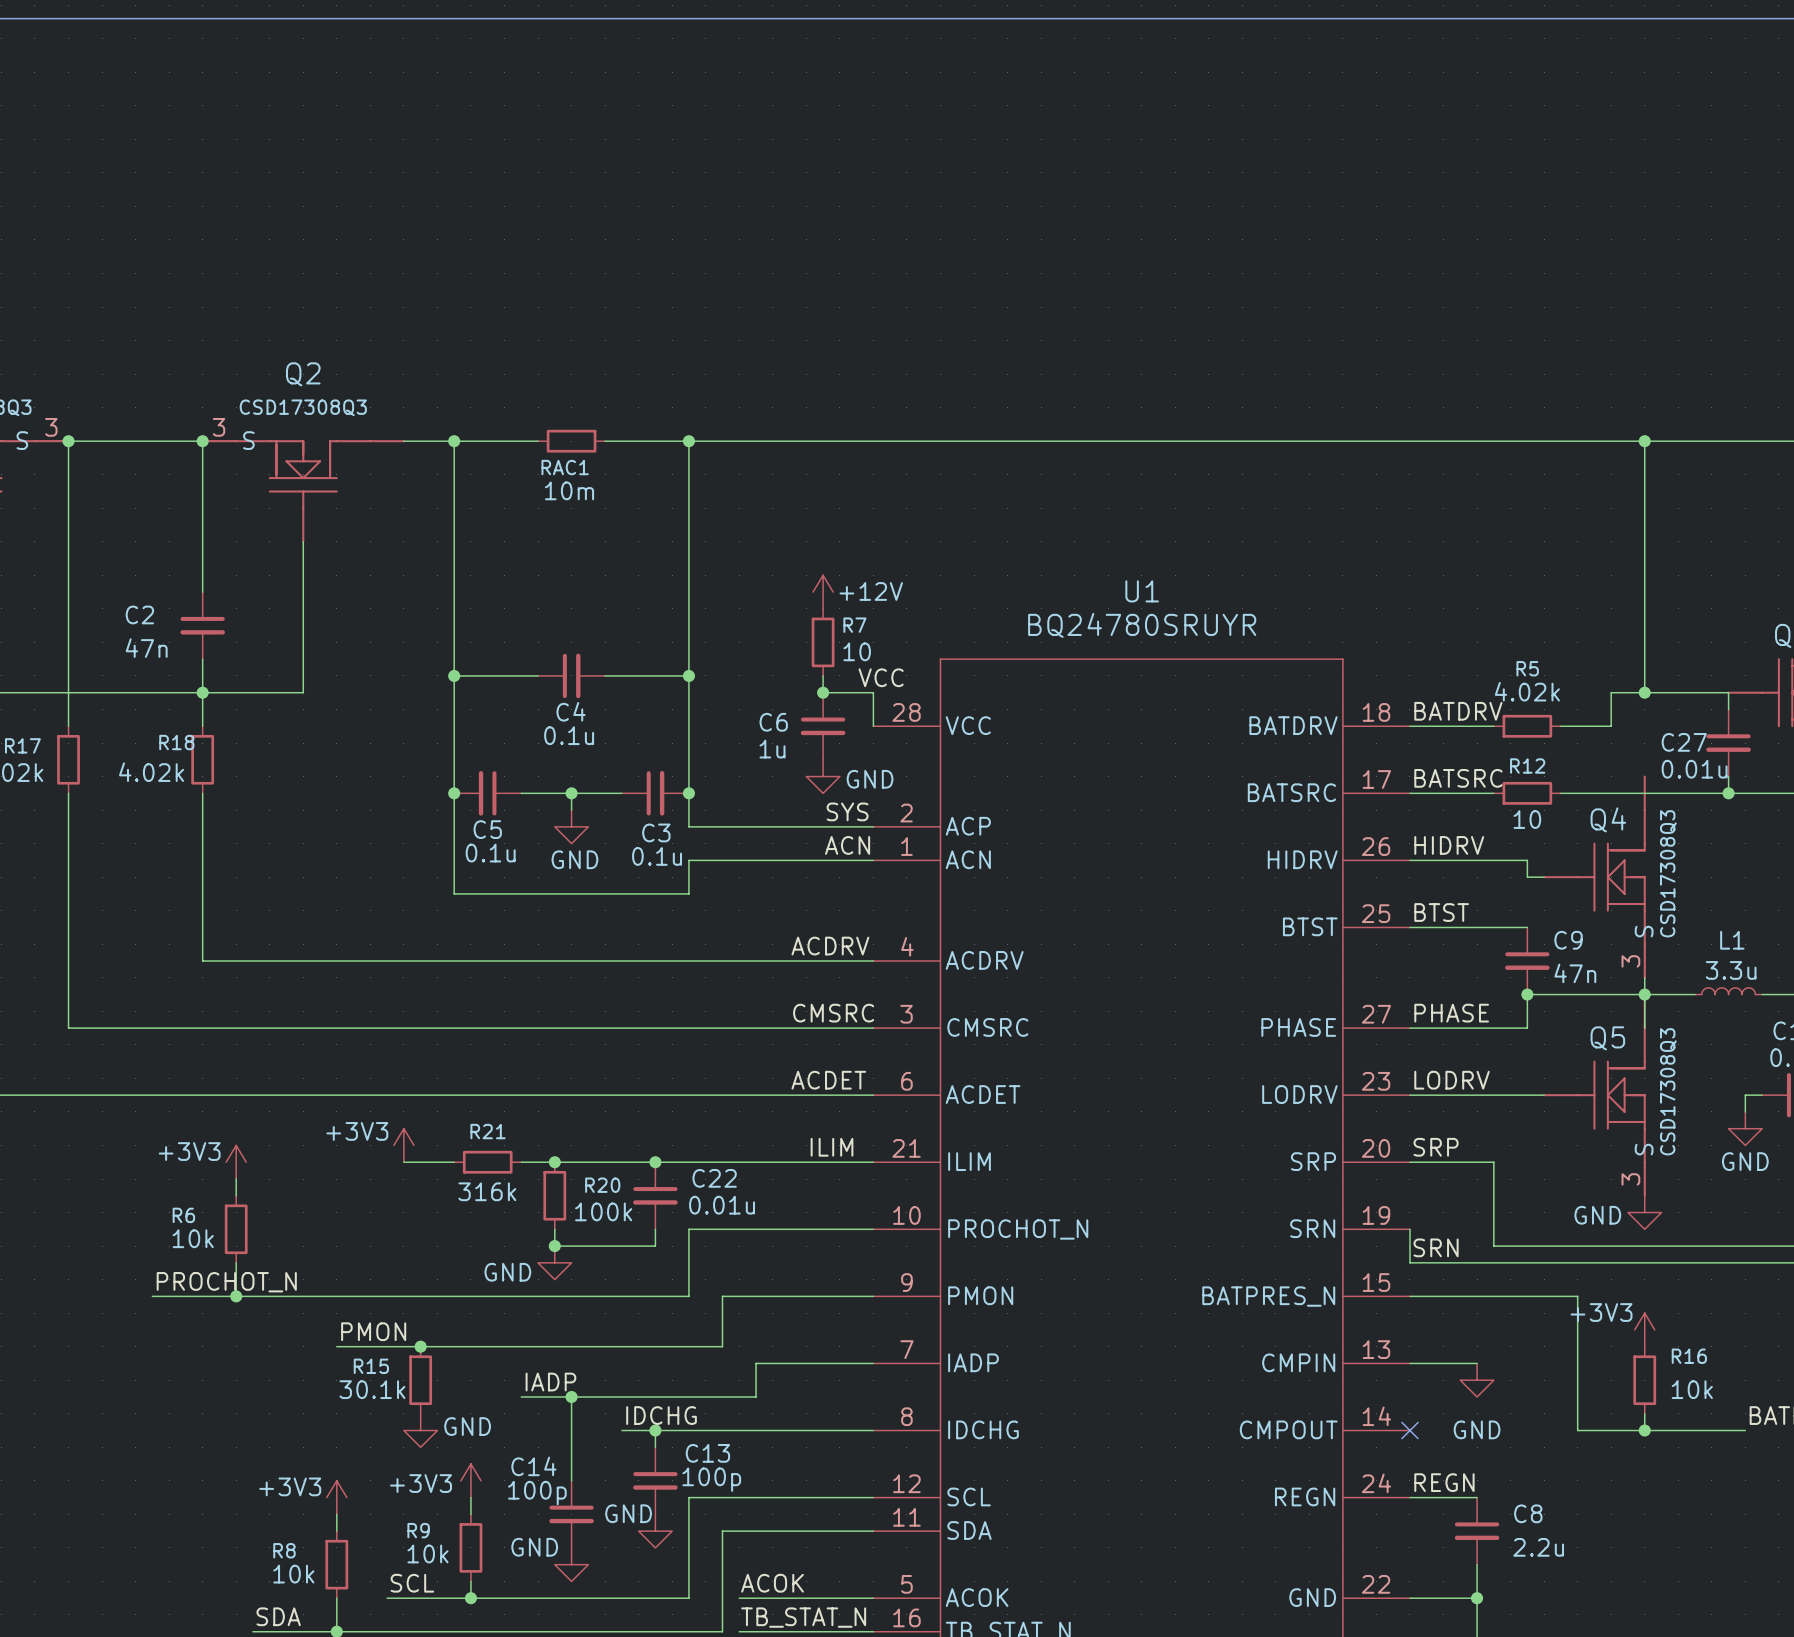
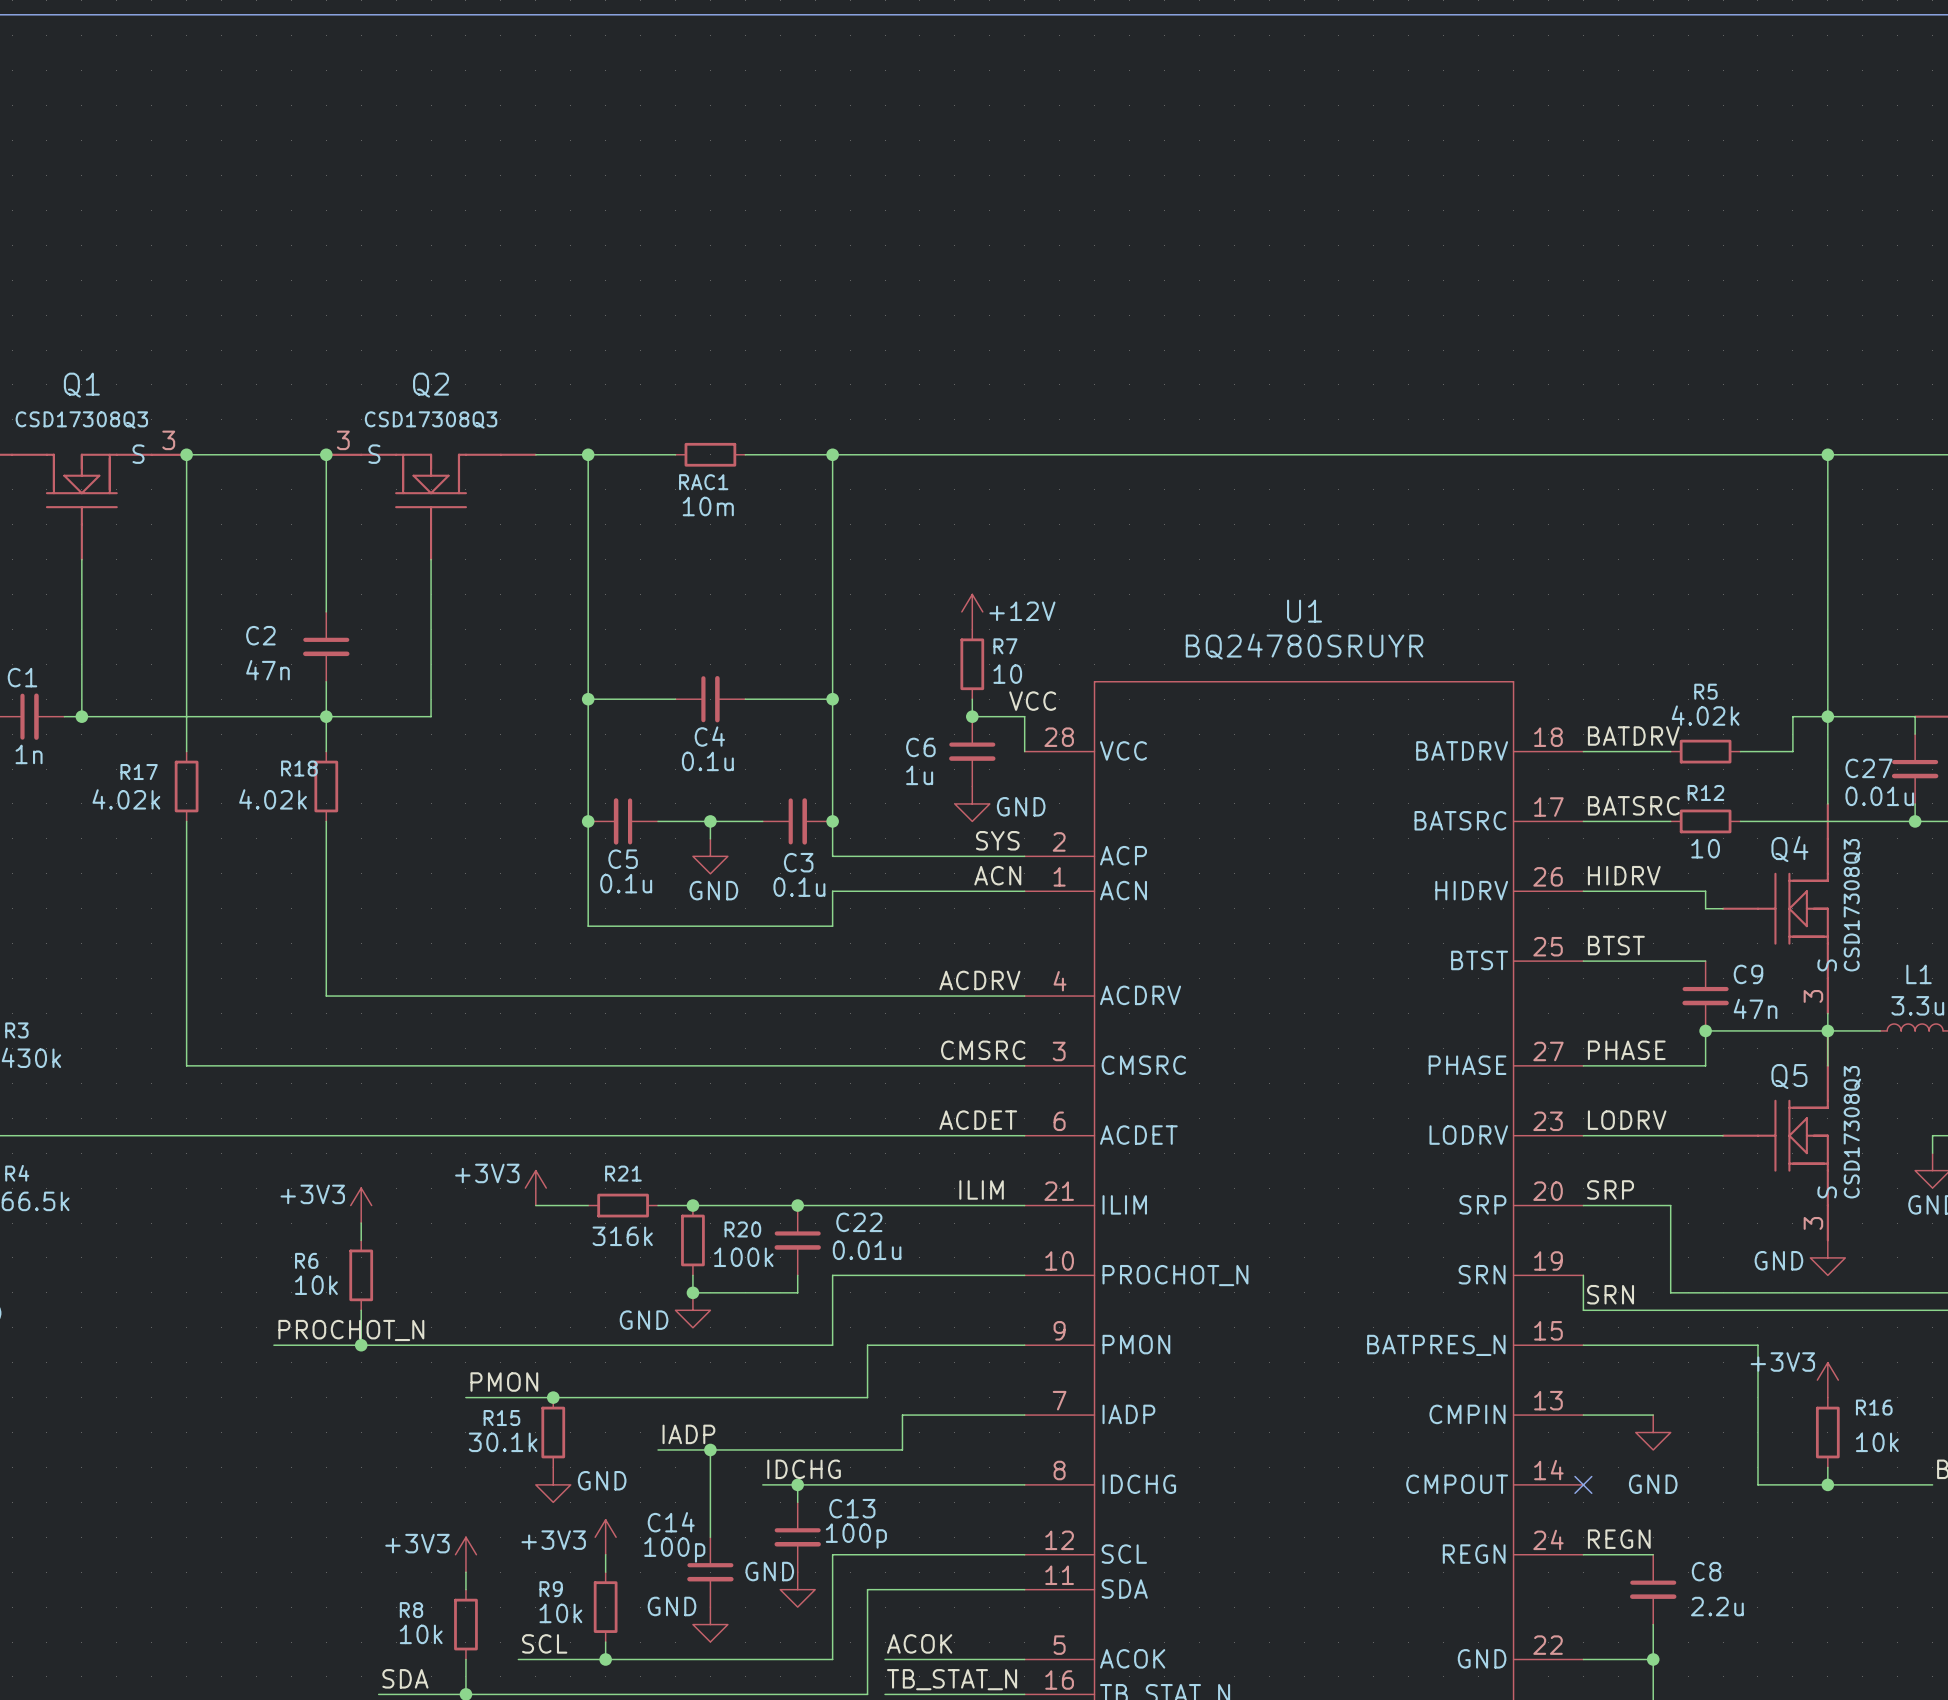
wire: none -> (1827, 716) (1827, 803)

